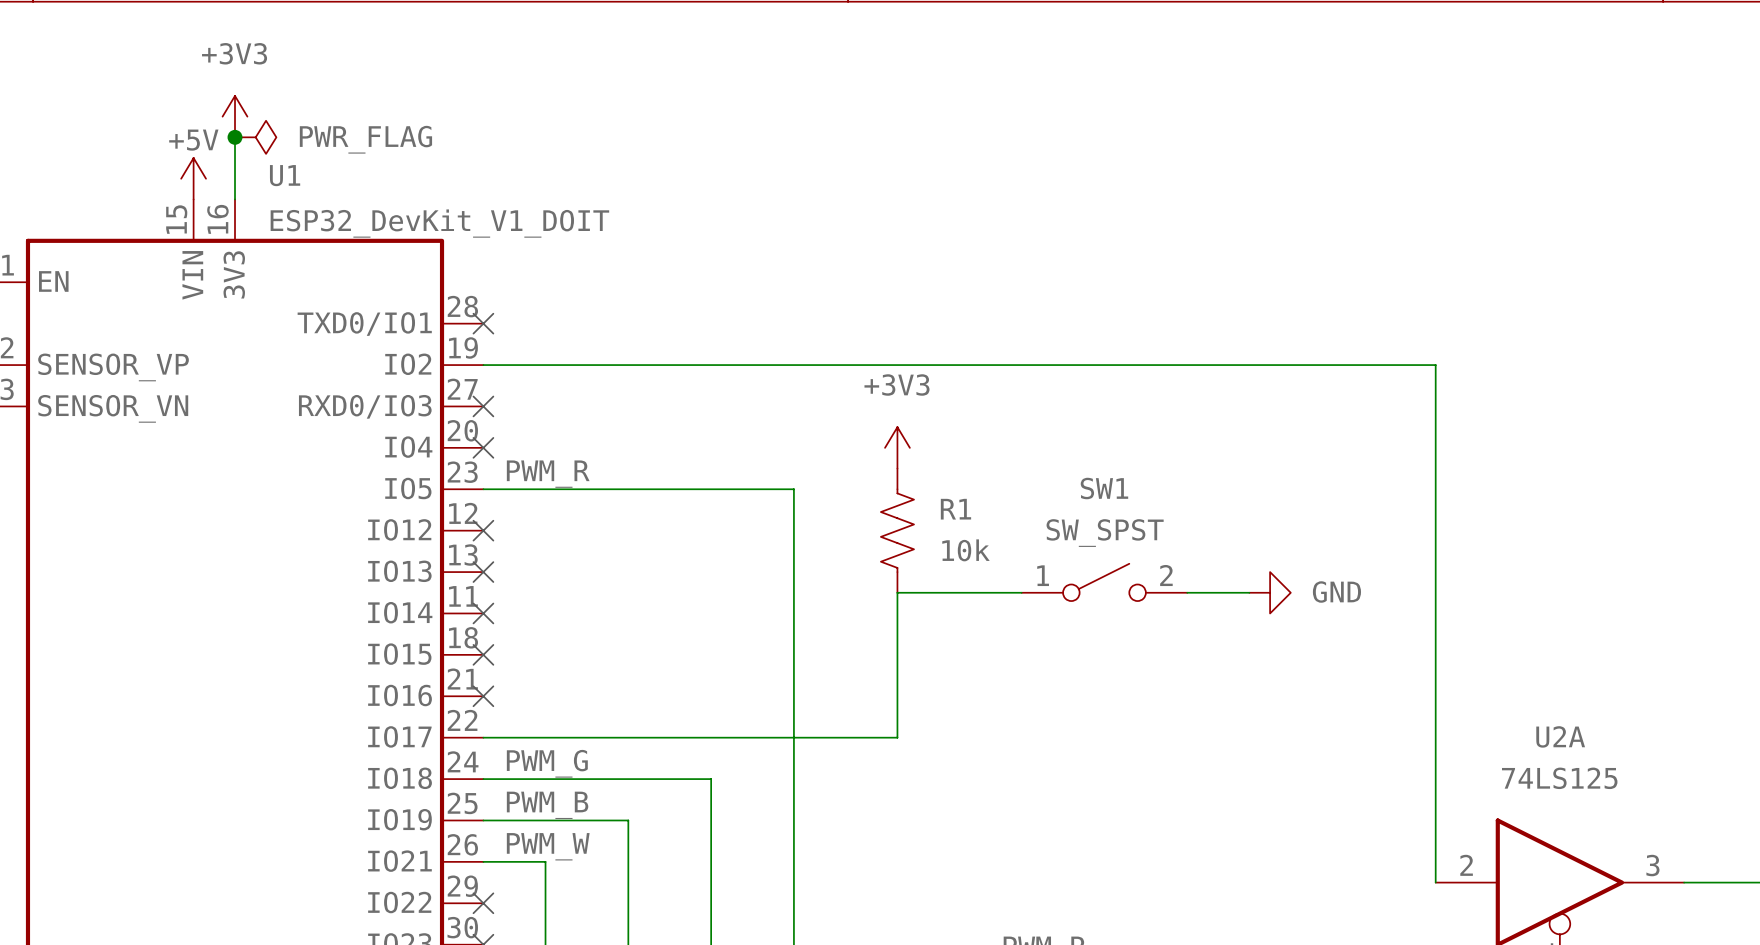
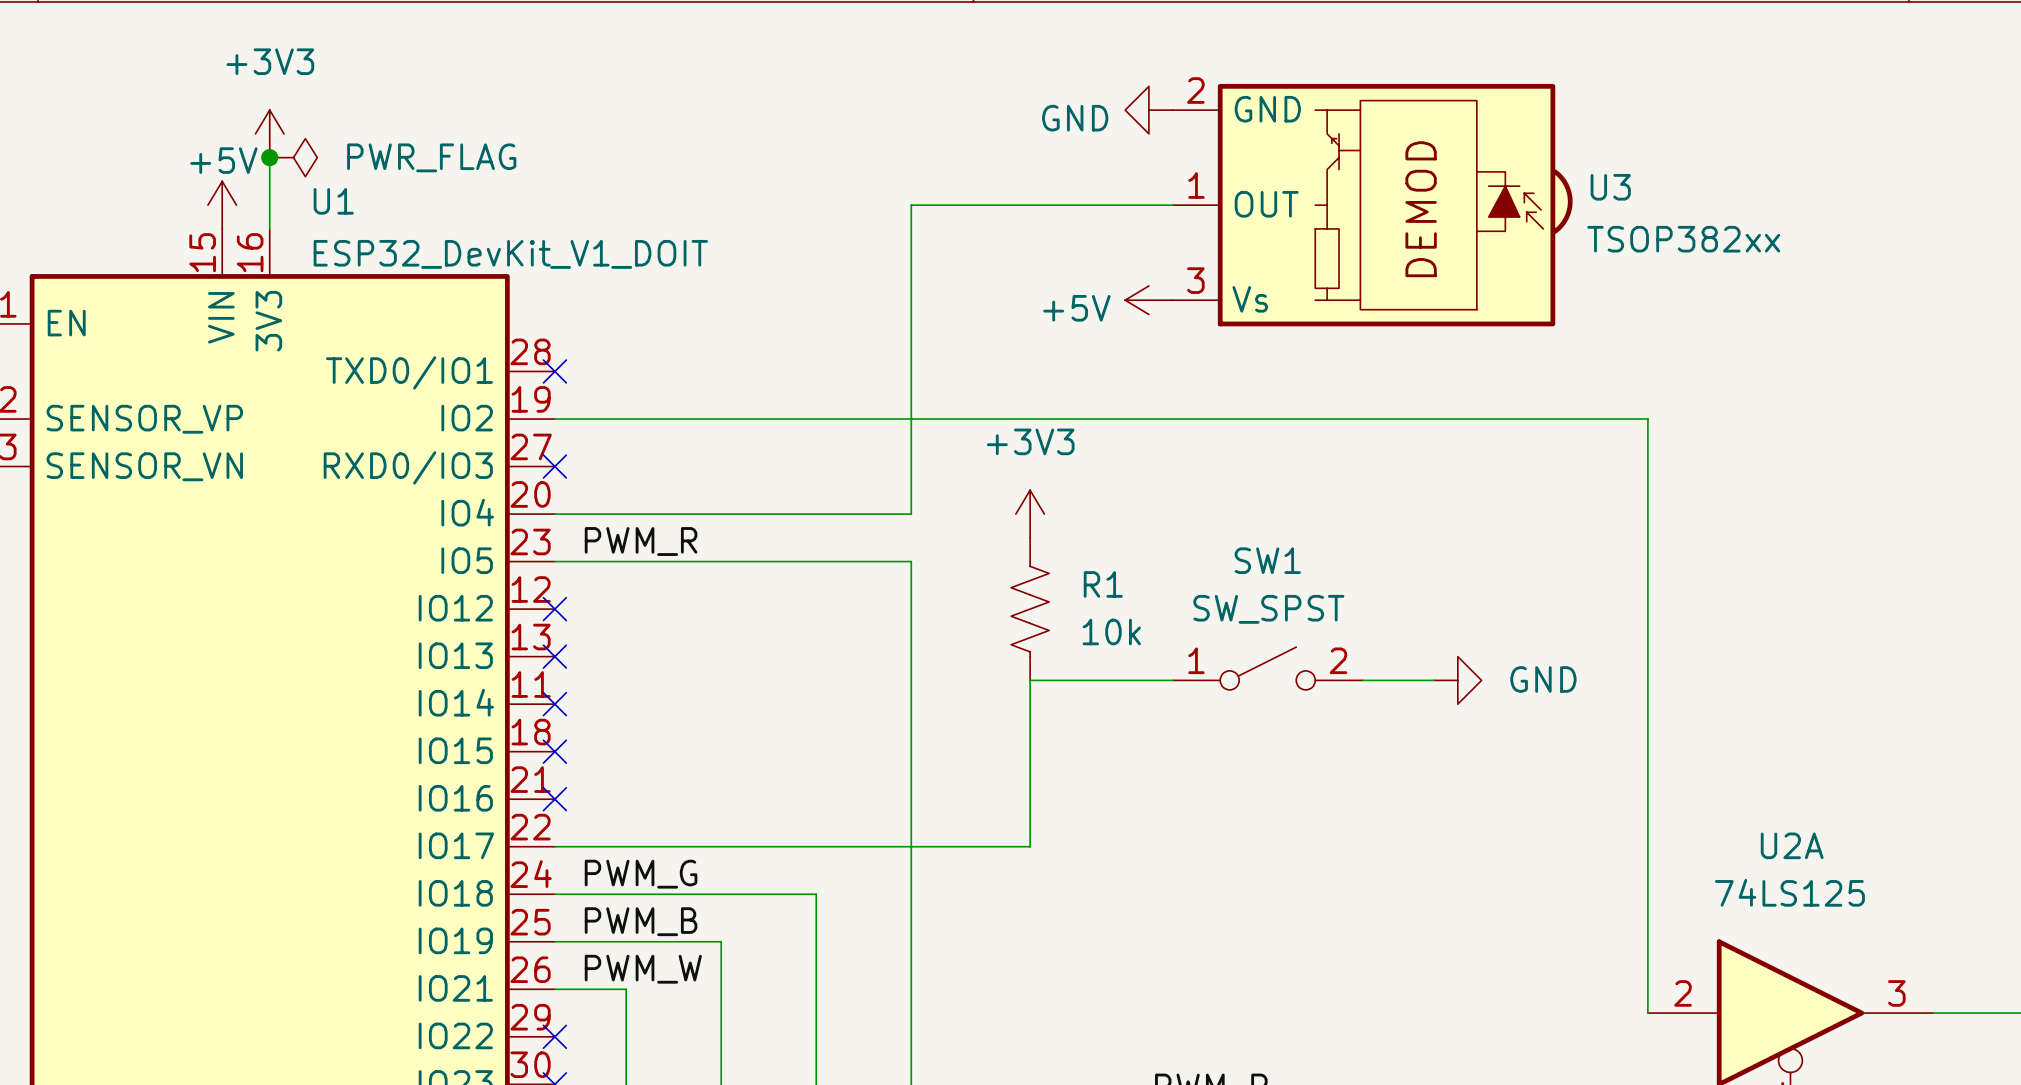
power symbol: none -> GND (1148, 110)
wire: none -> (1172, 205) (911, 205) (911, 514) (554, 514)
U3: none -> TSOP382xx (1372, 205)
power symbol: none -> +5V (1148, 300)
no-connect mark: (483, 447) -> none

